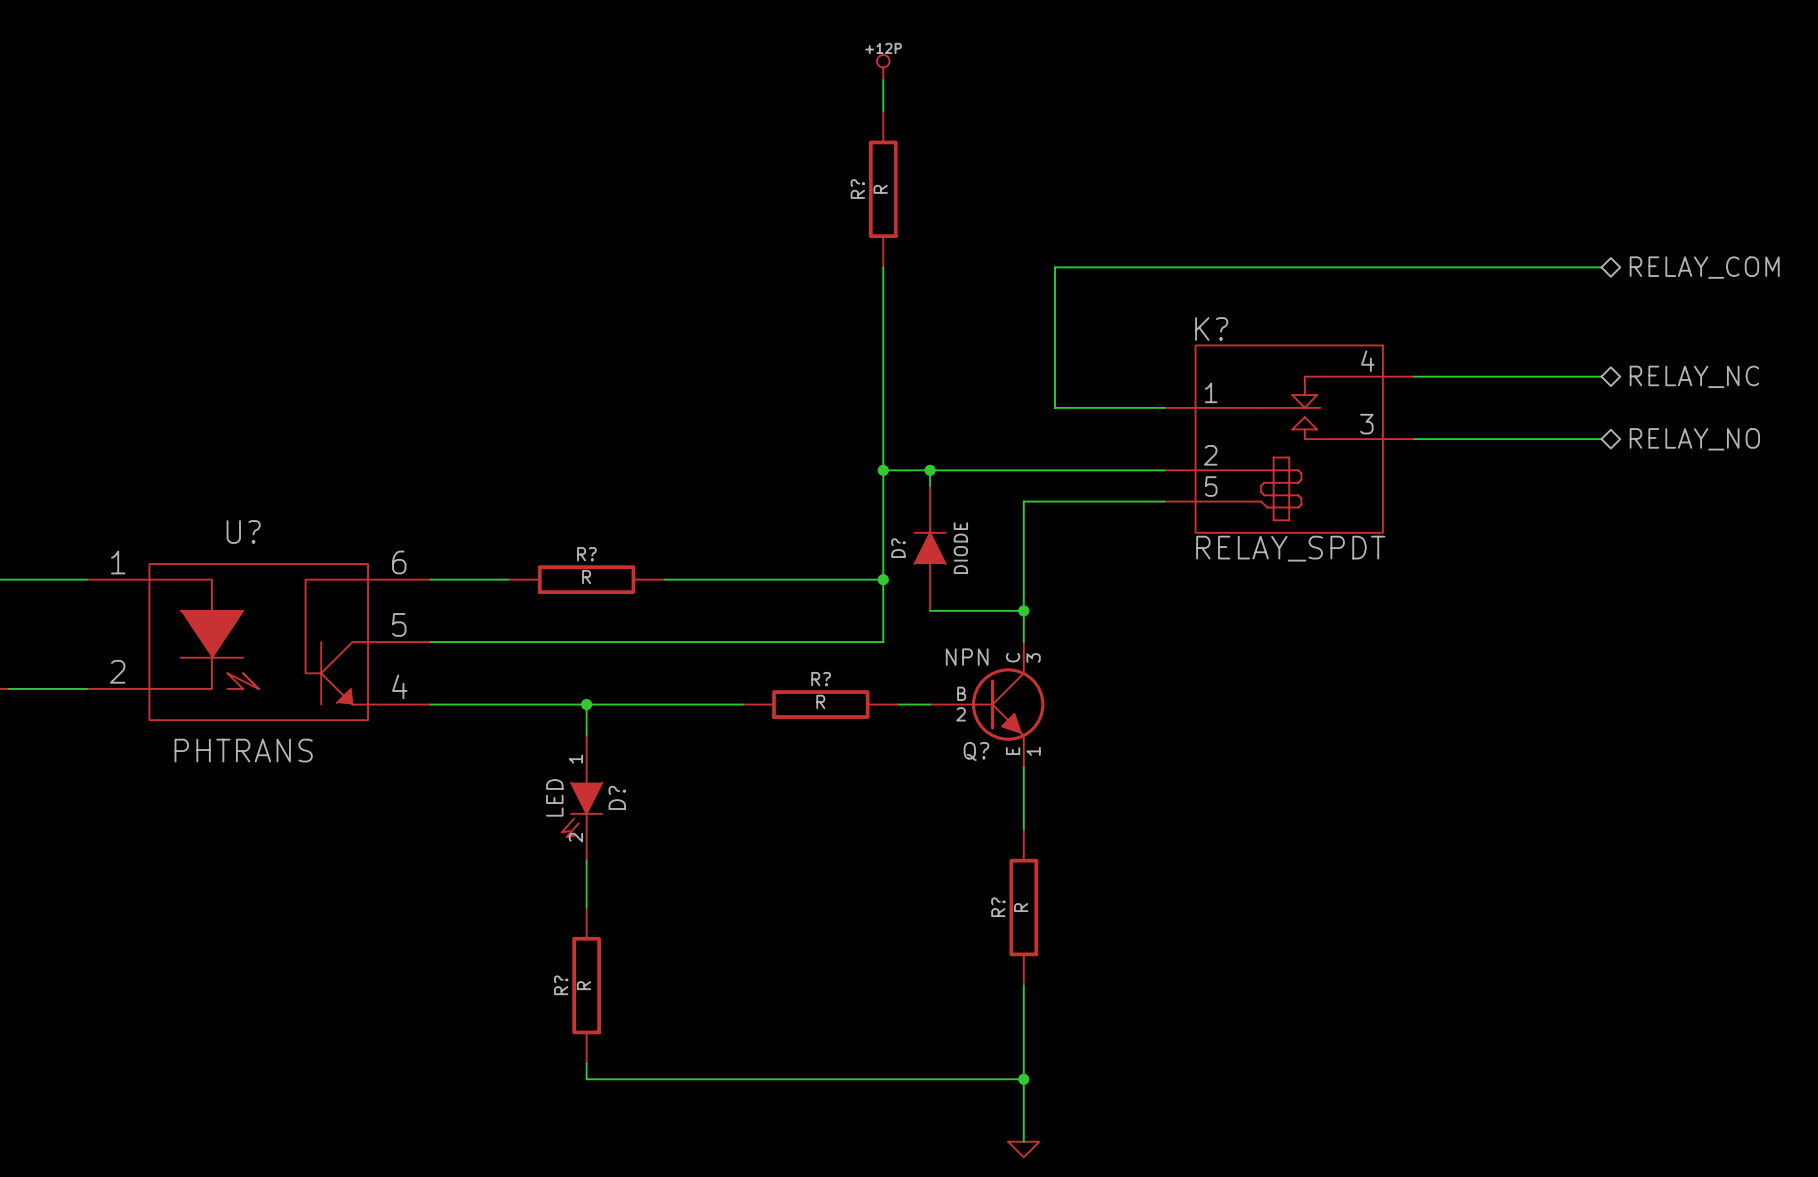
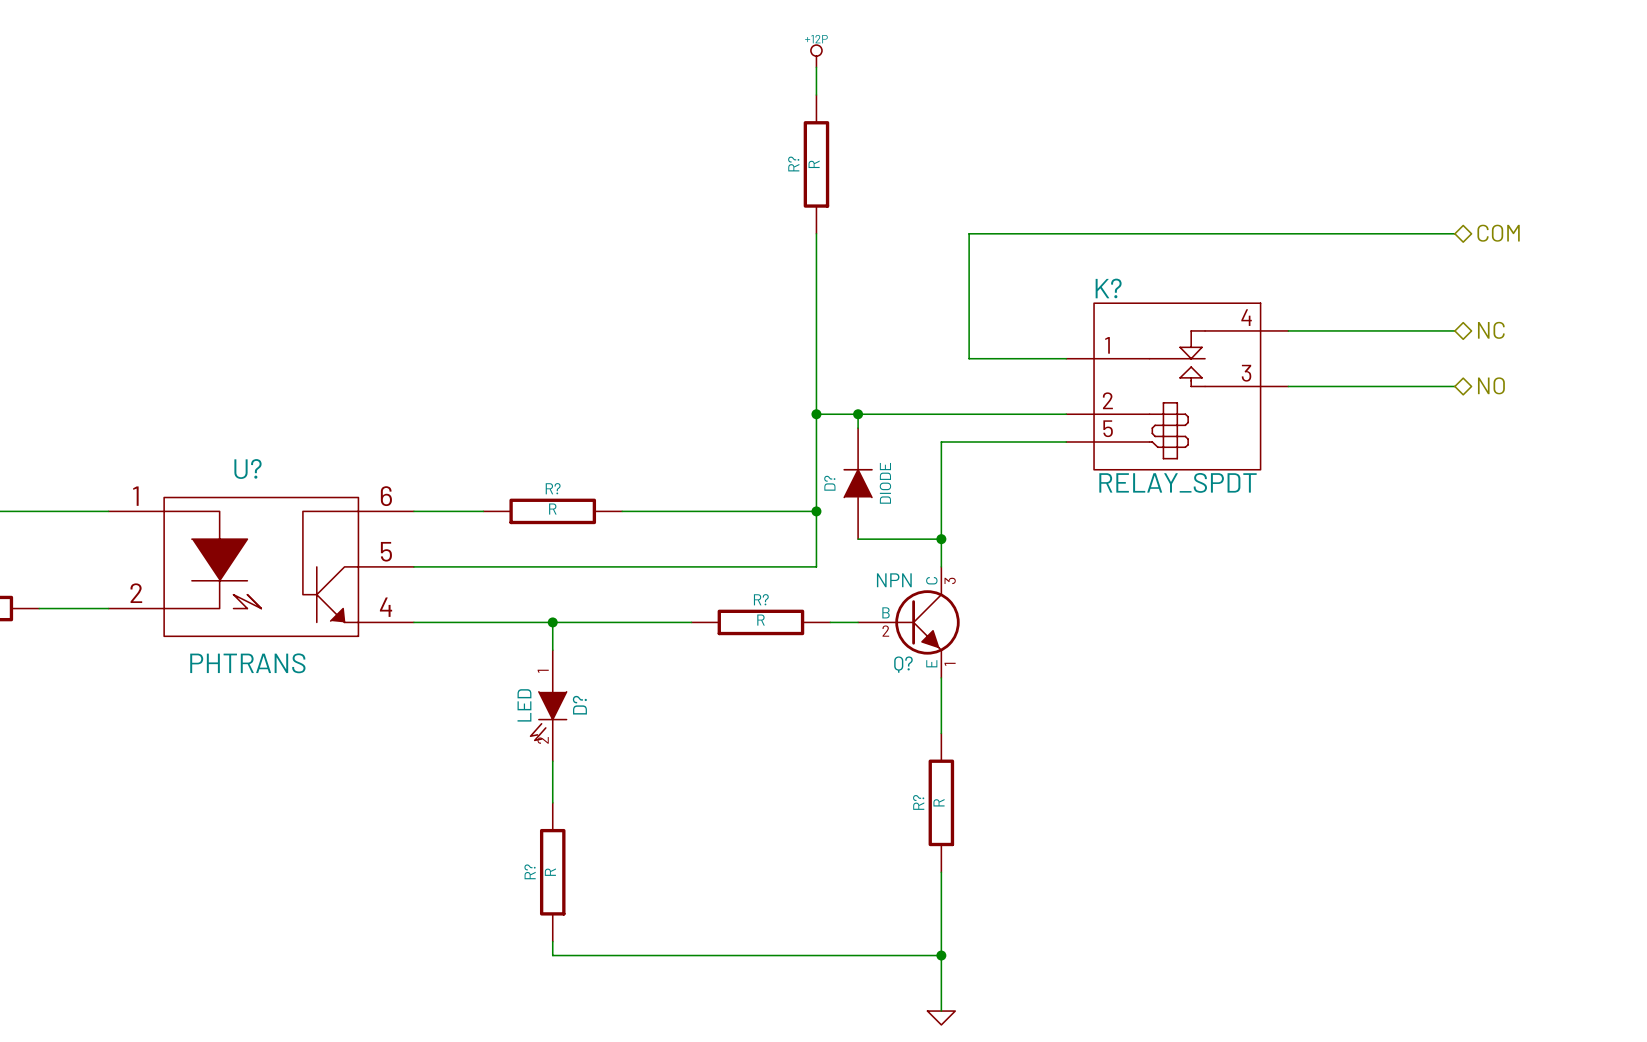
hierarchical label: RELAY_COM (1704, 267) -> COM (1498, 233)
hierarchical label: RELAY_NC (1694, 376) -> NC (1491, 330)
hierarchical label: RELAY_NO (1694, 439) -> NO (1491, 385)

